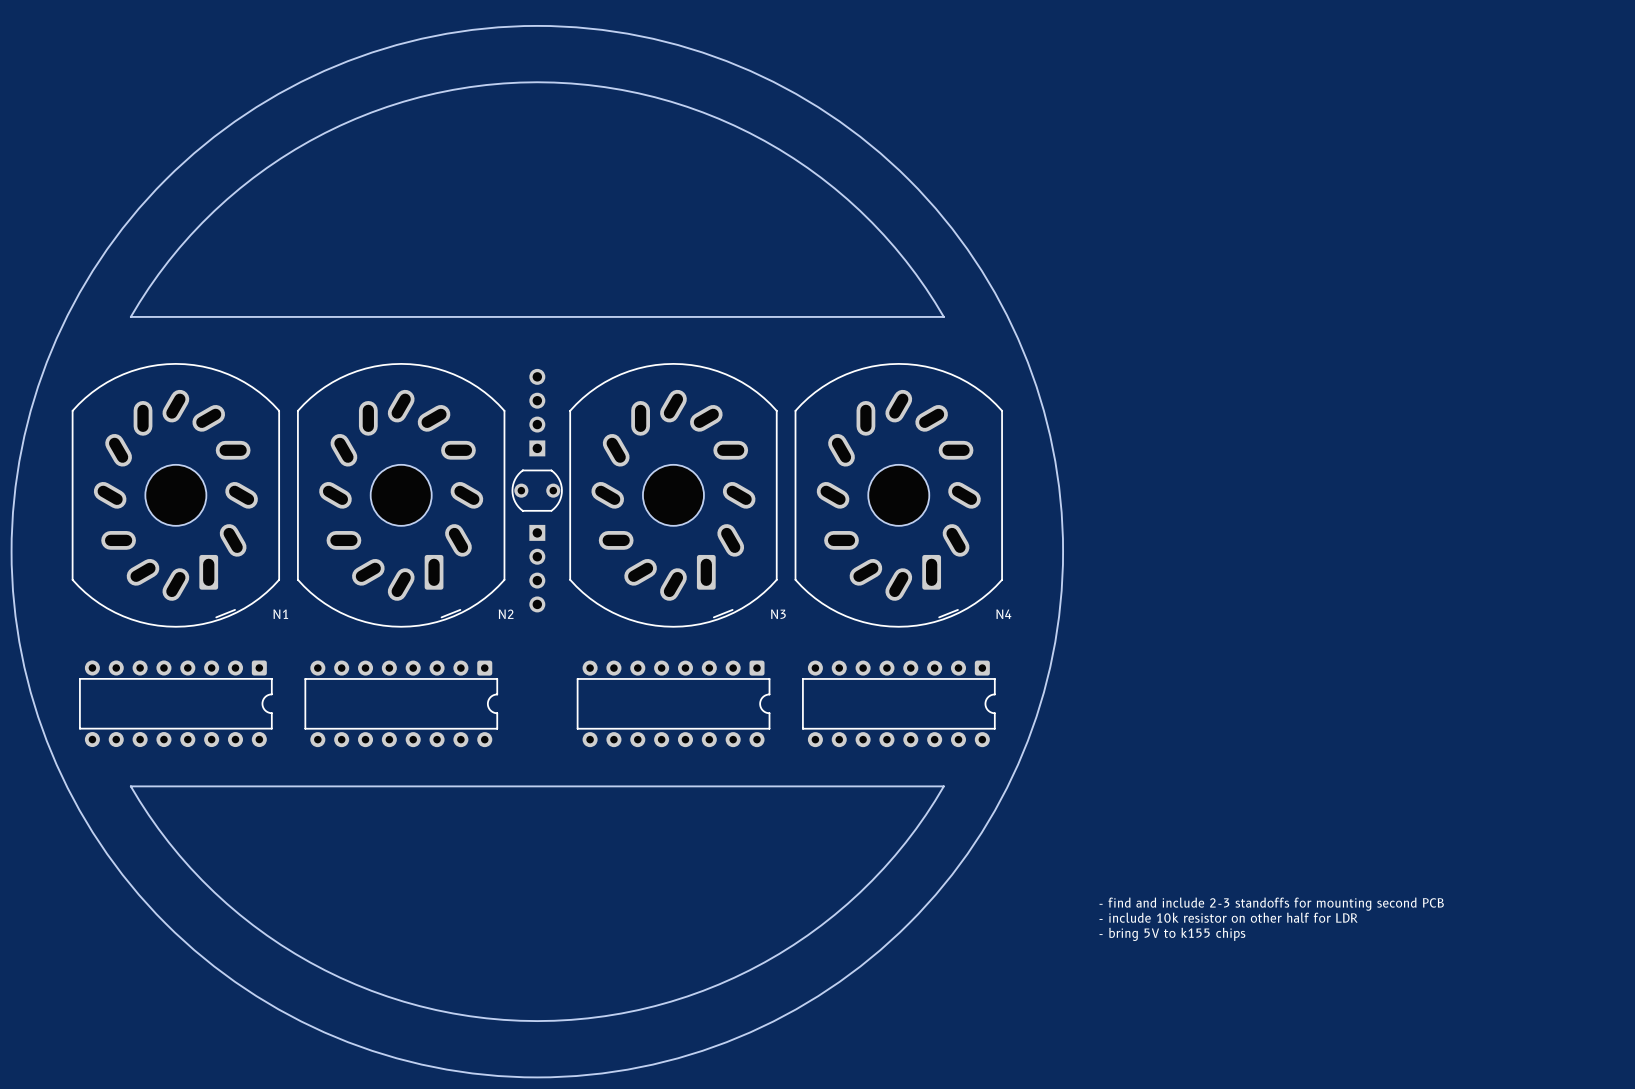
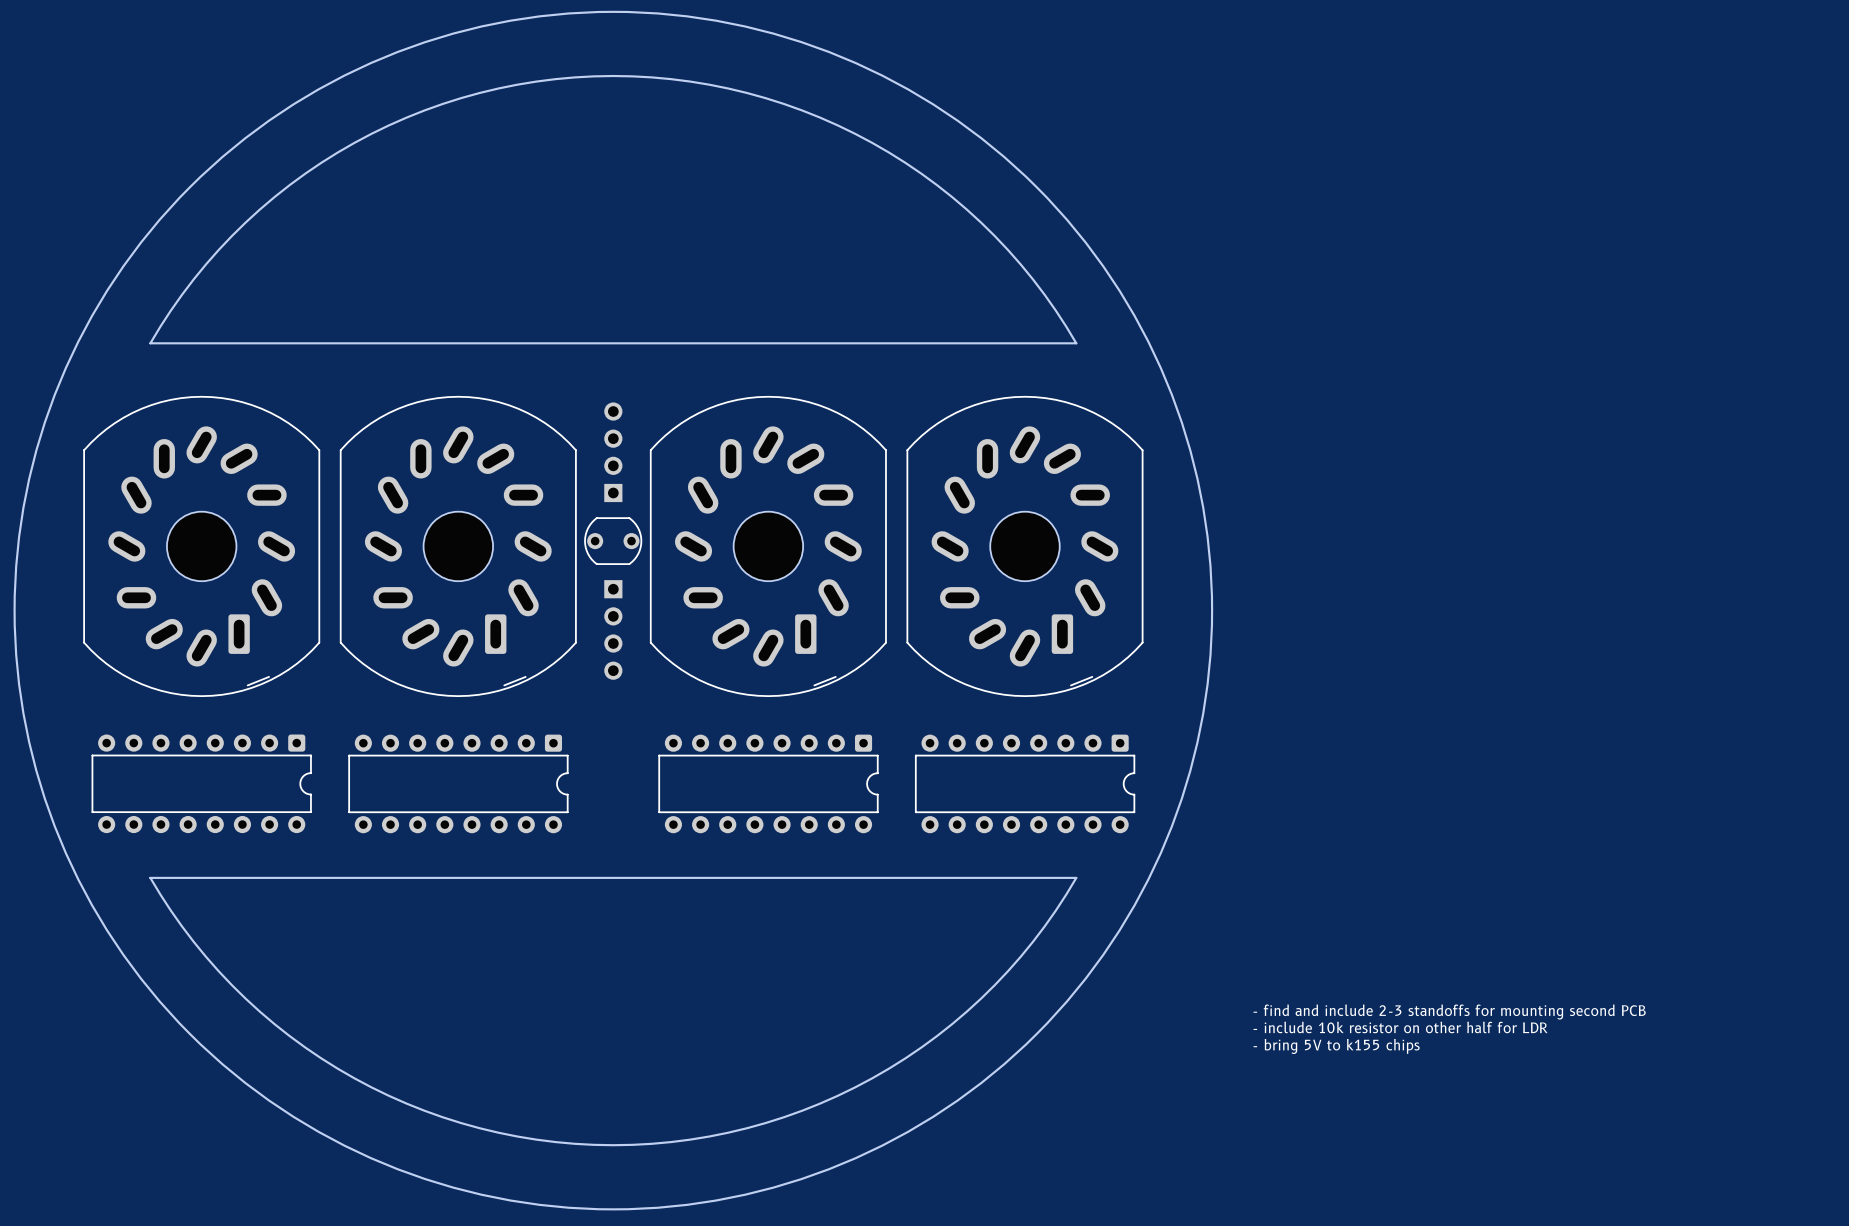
N1: (175, 495) -> none
part: none -> (201, 546)
N2: (401, 495) -> none
part: none -> (458, 546)
N3: (673, 495) -> none
part: none -> (768, 546)
N4: (898, 495) -> none
part: none -> (1024, 546)

